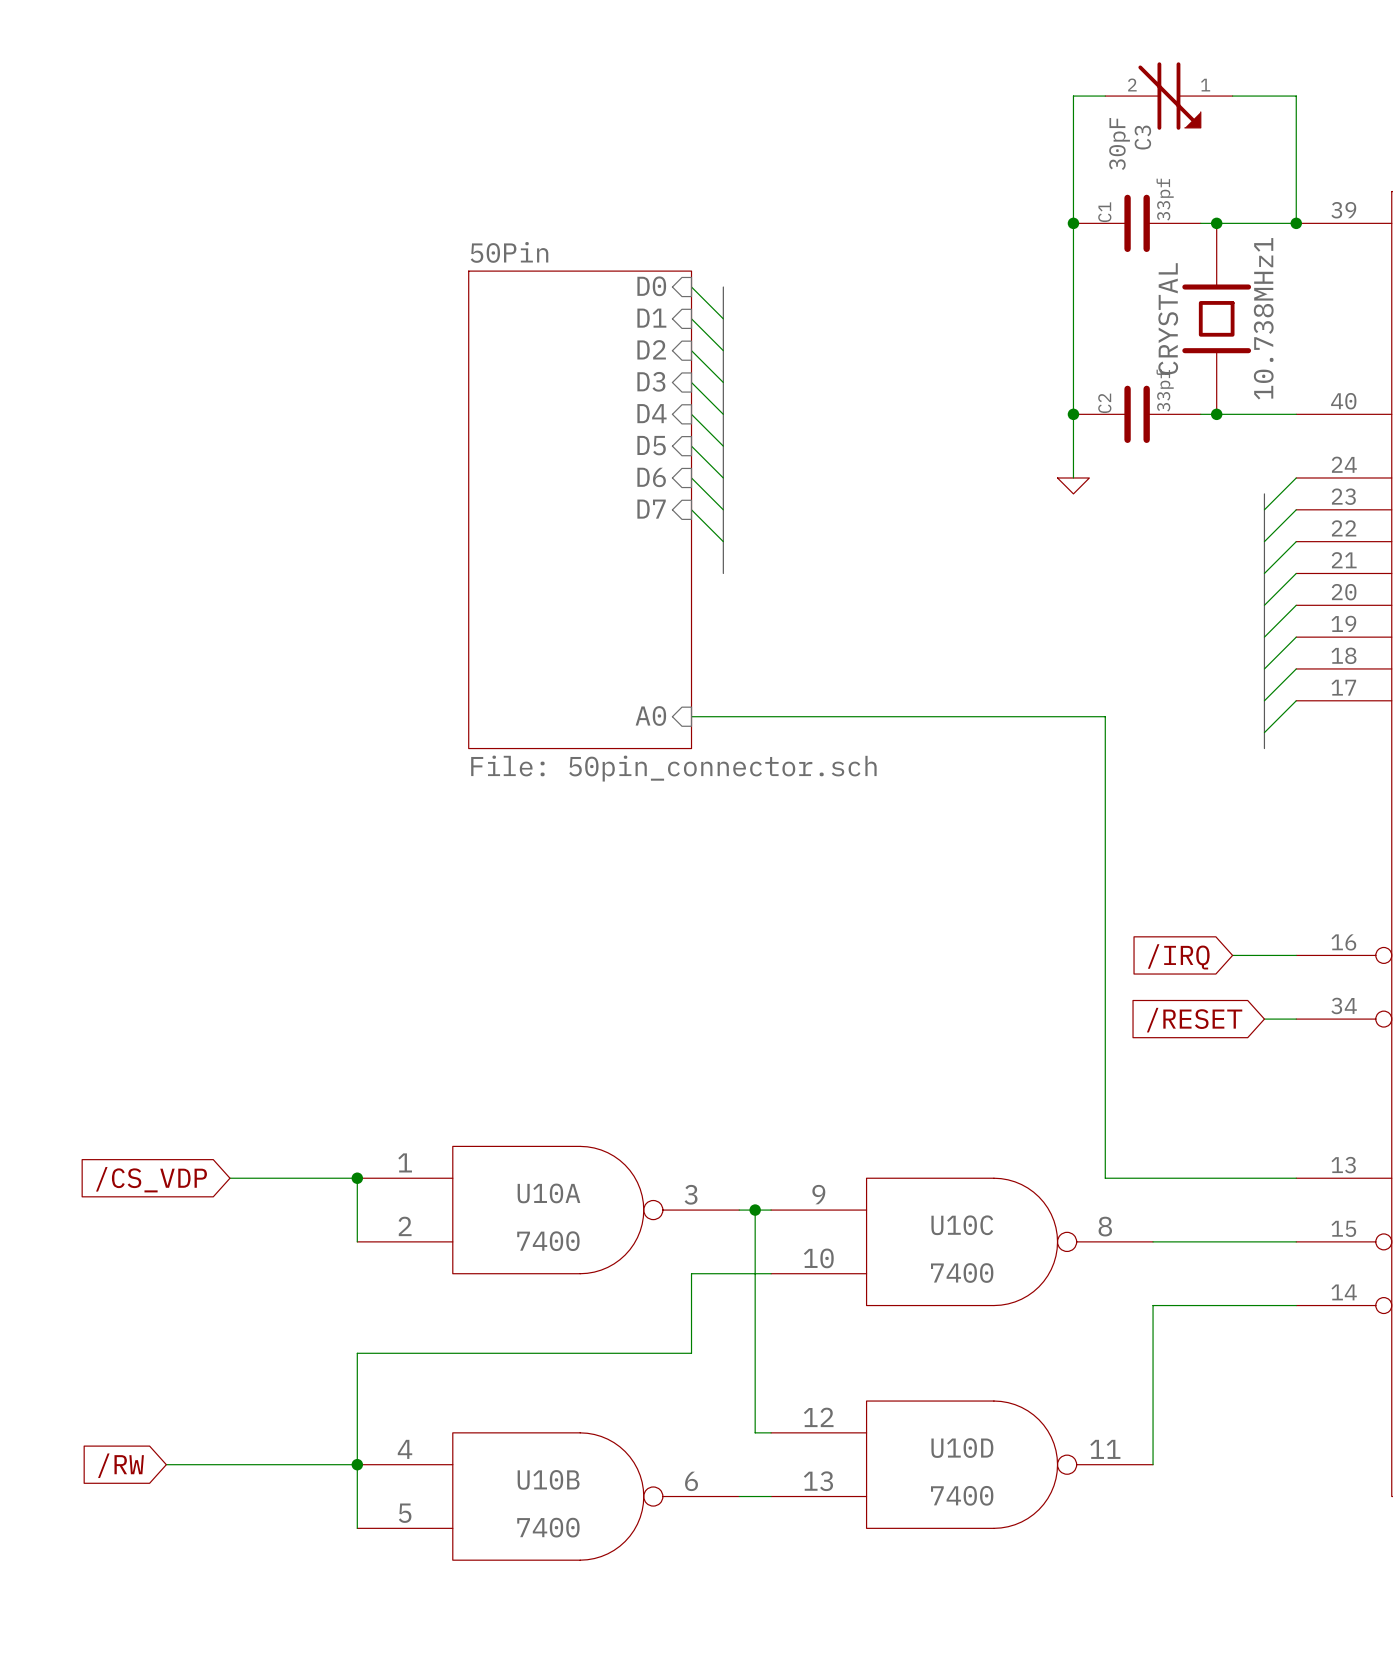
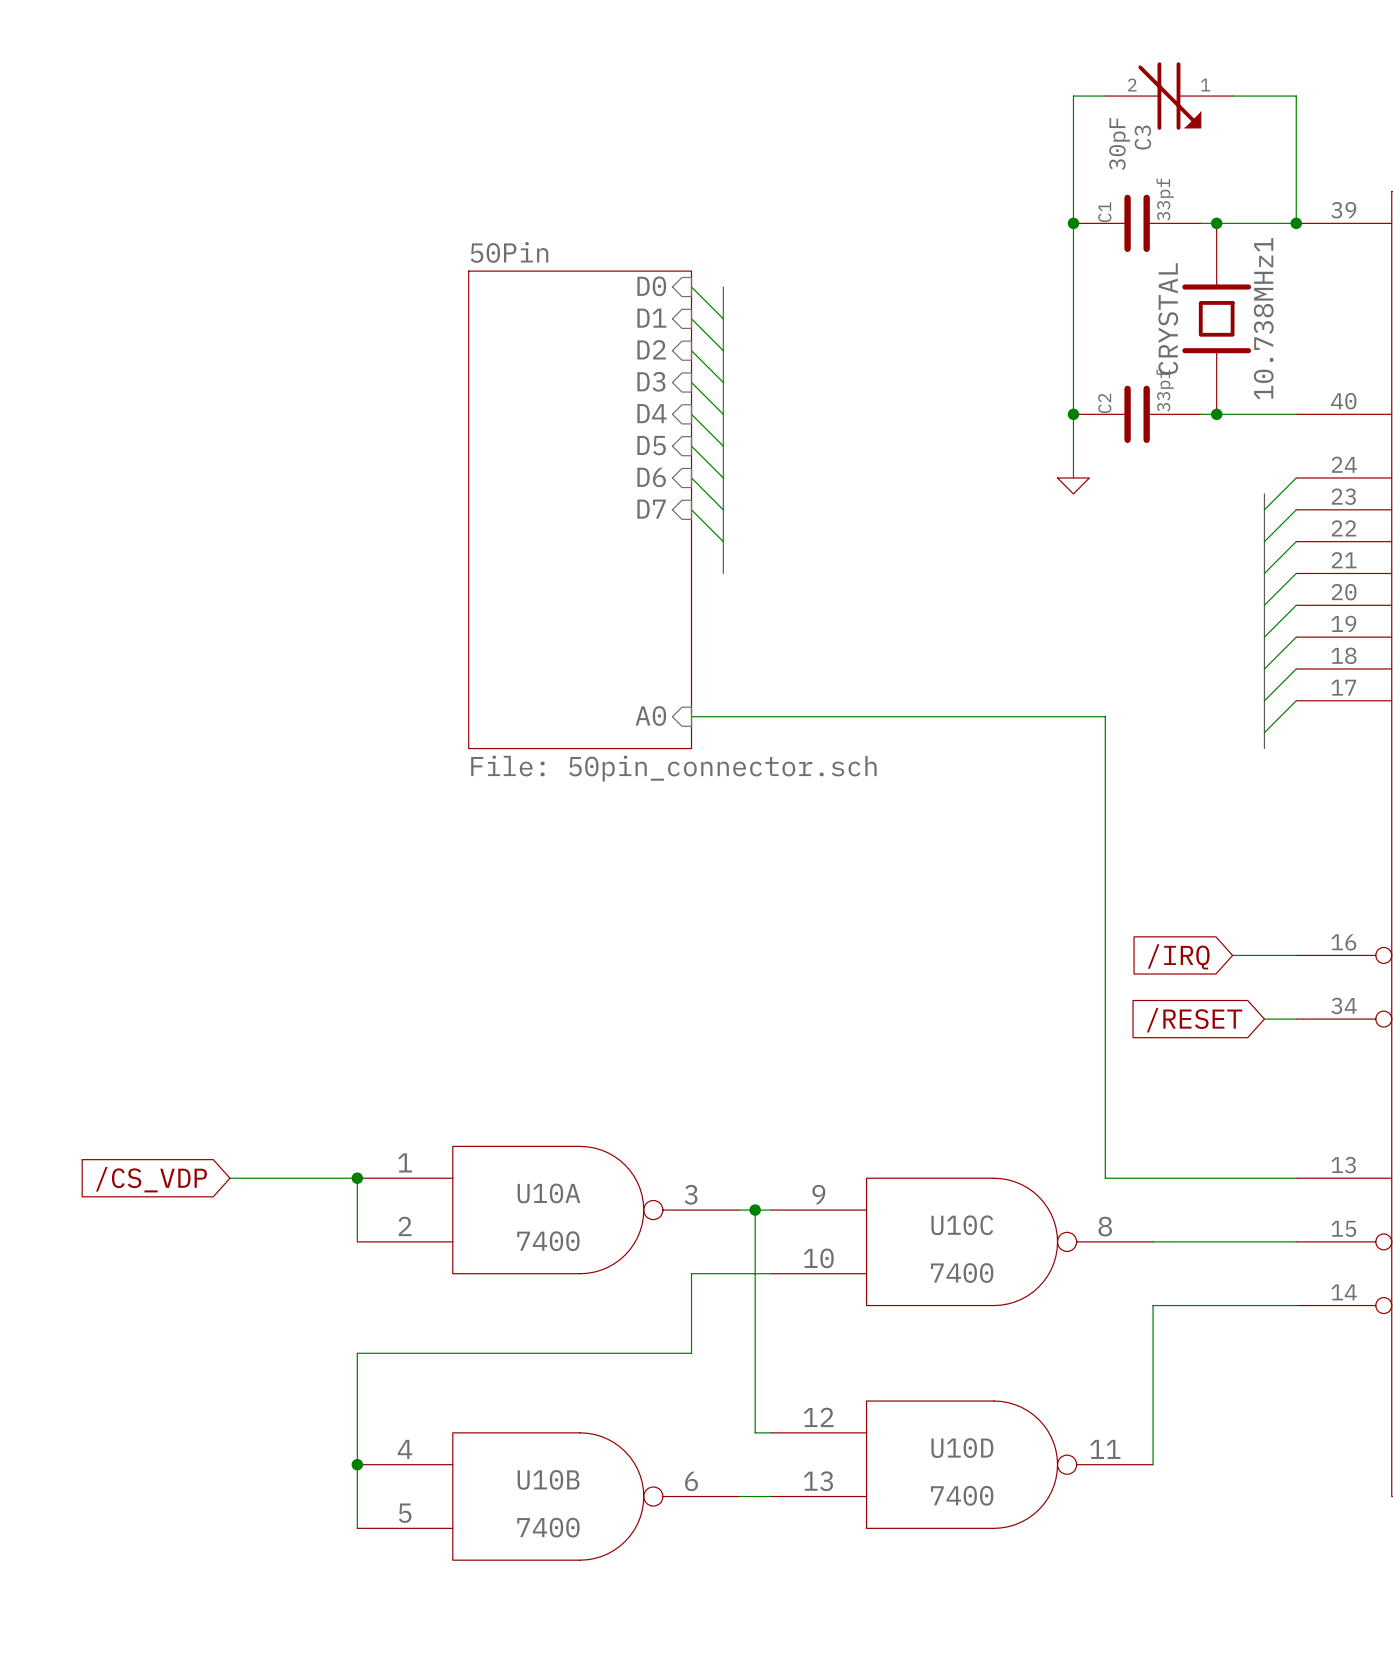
wire: (166, 1464) (357, 1464) -> none
global label: /RW (120, 1465) -> none

